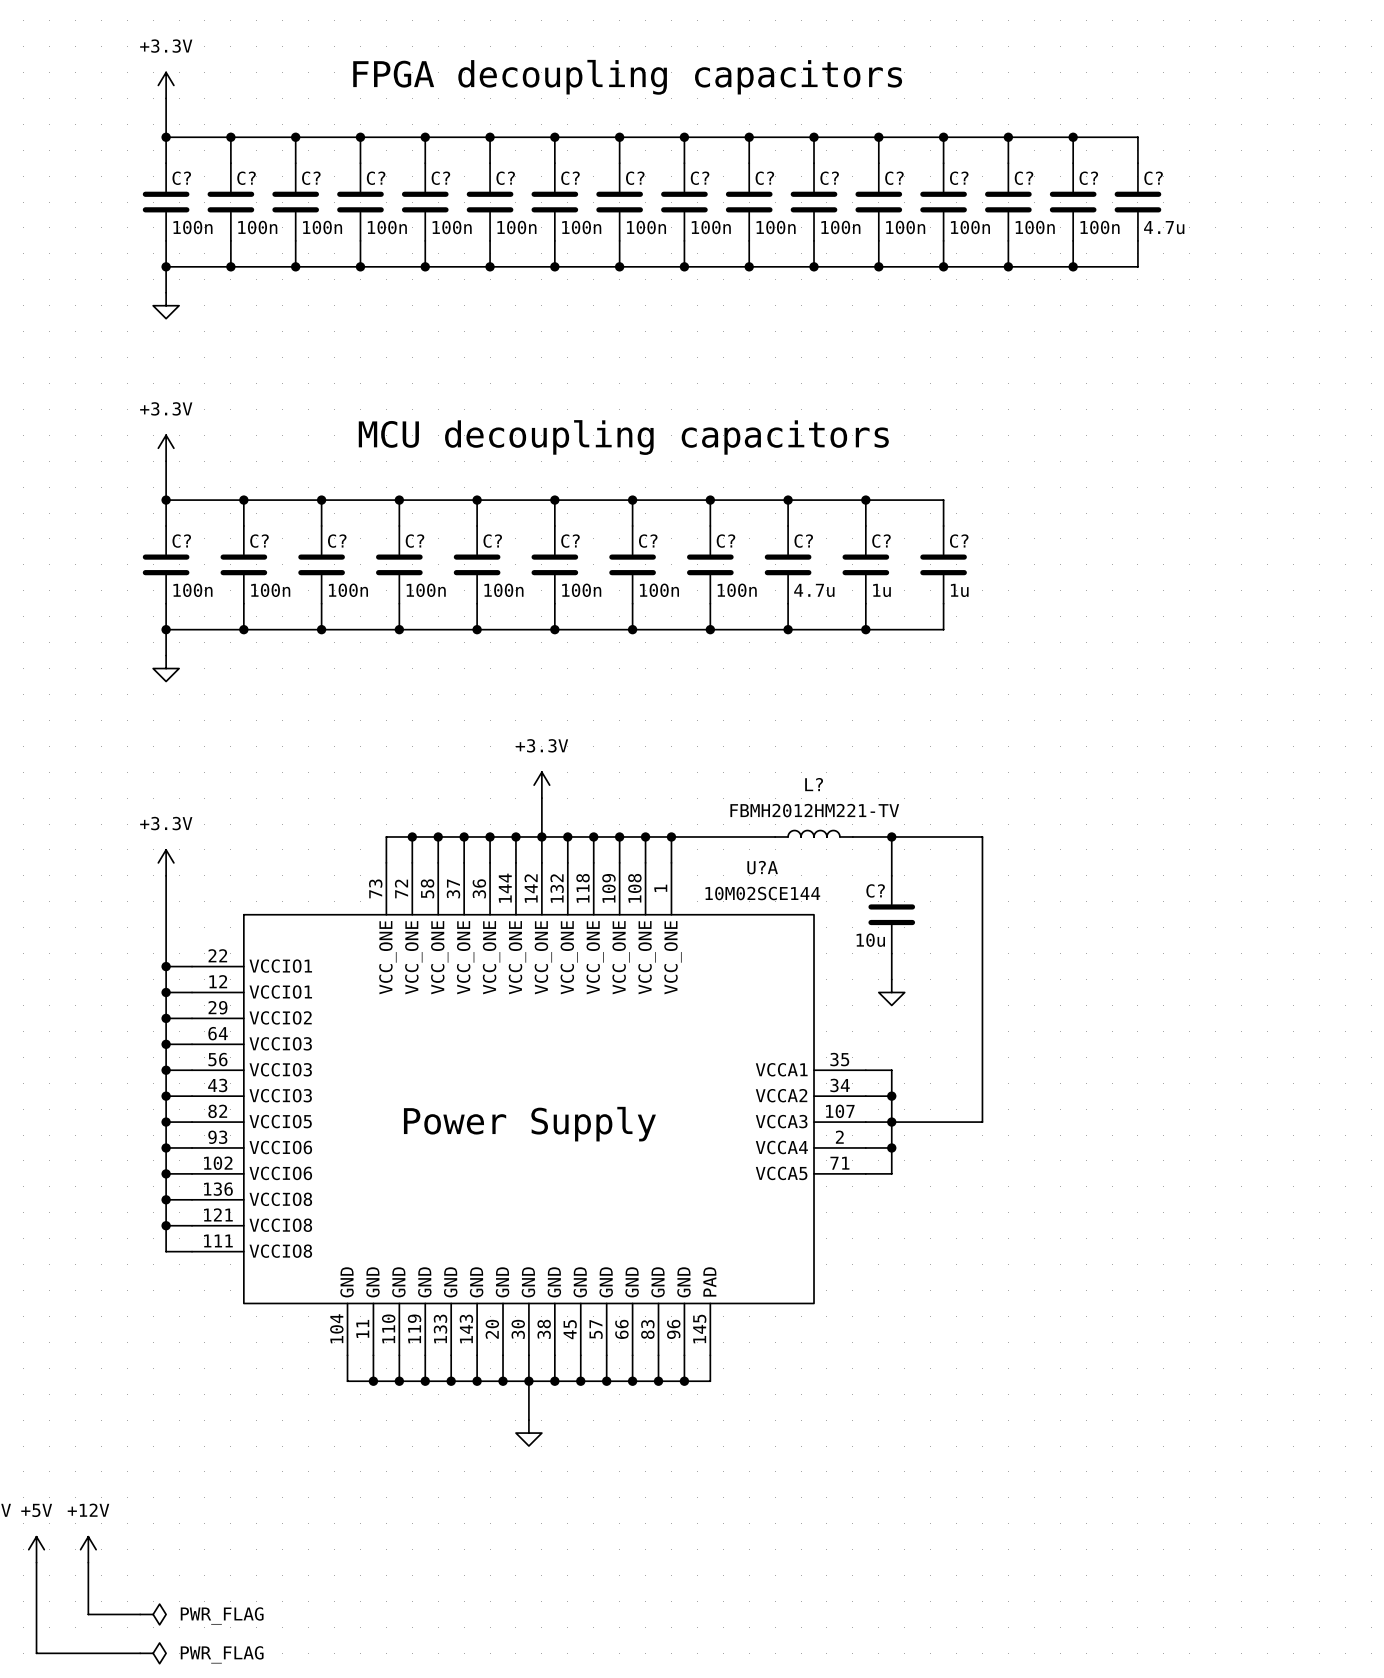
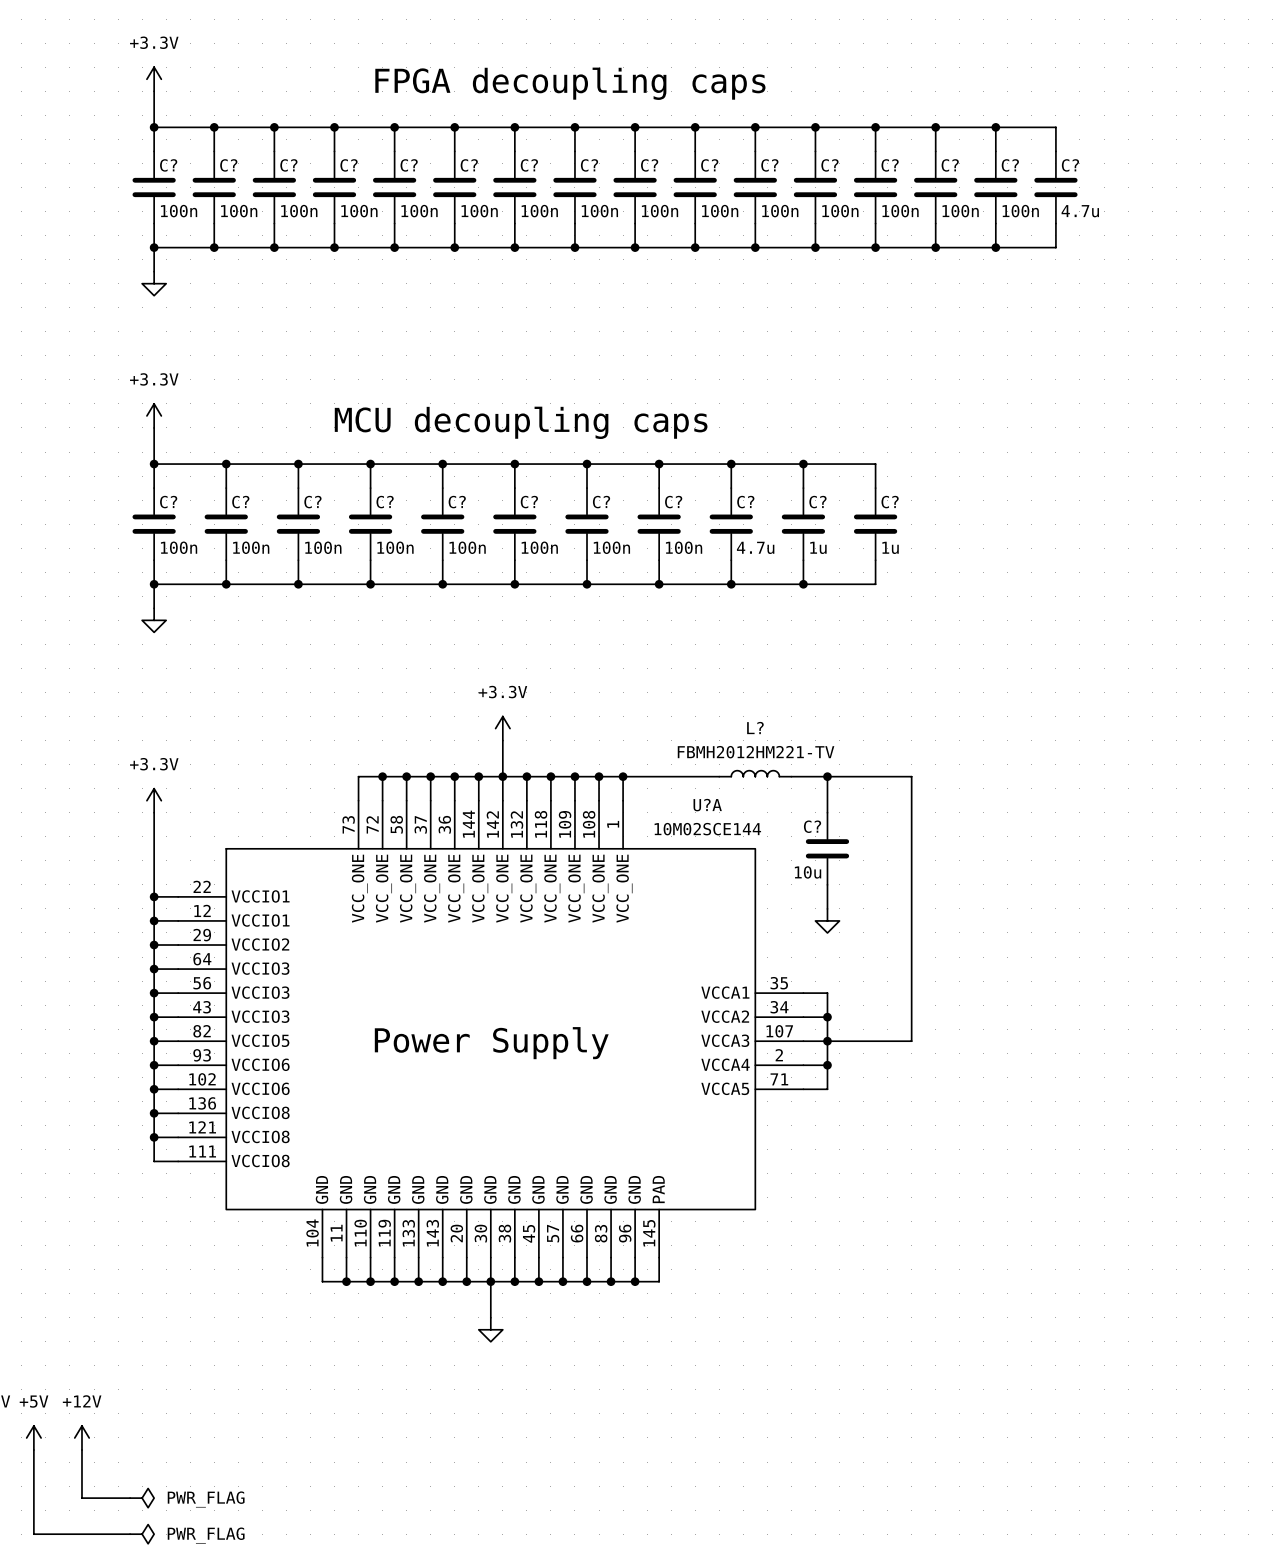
text: FPGA decoupling capacitors (627, 77) -> FPGA decoupling caps (570, 83)
text: MCU decoupling capacitors (623, 437) -> MCU decoupling caps (521, 422)

